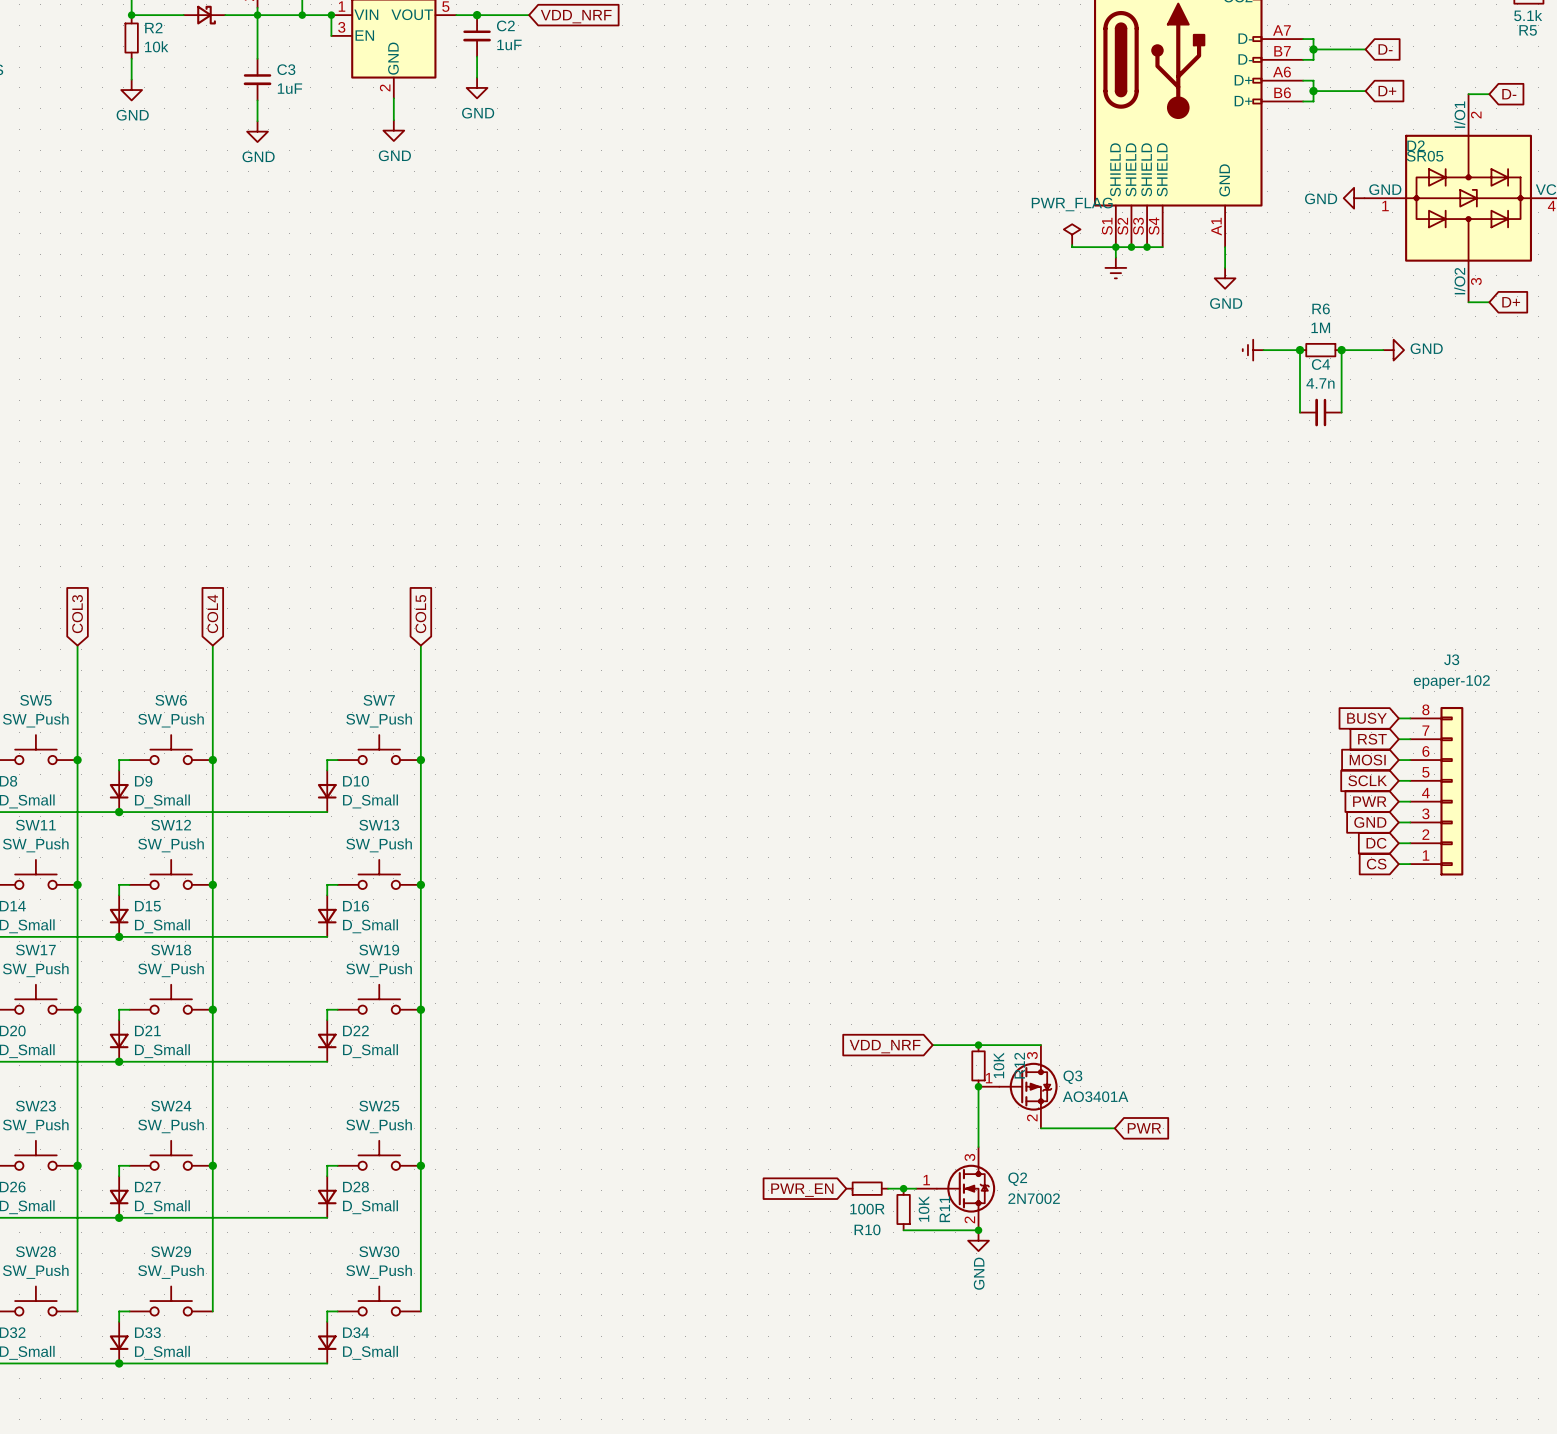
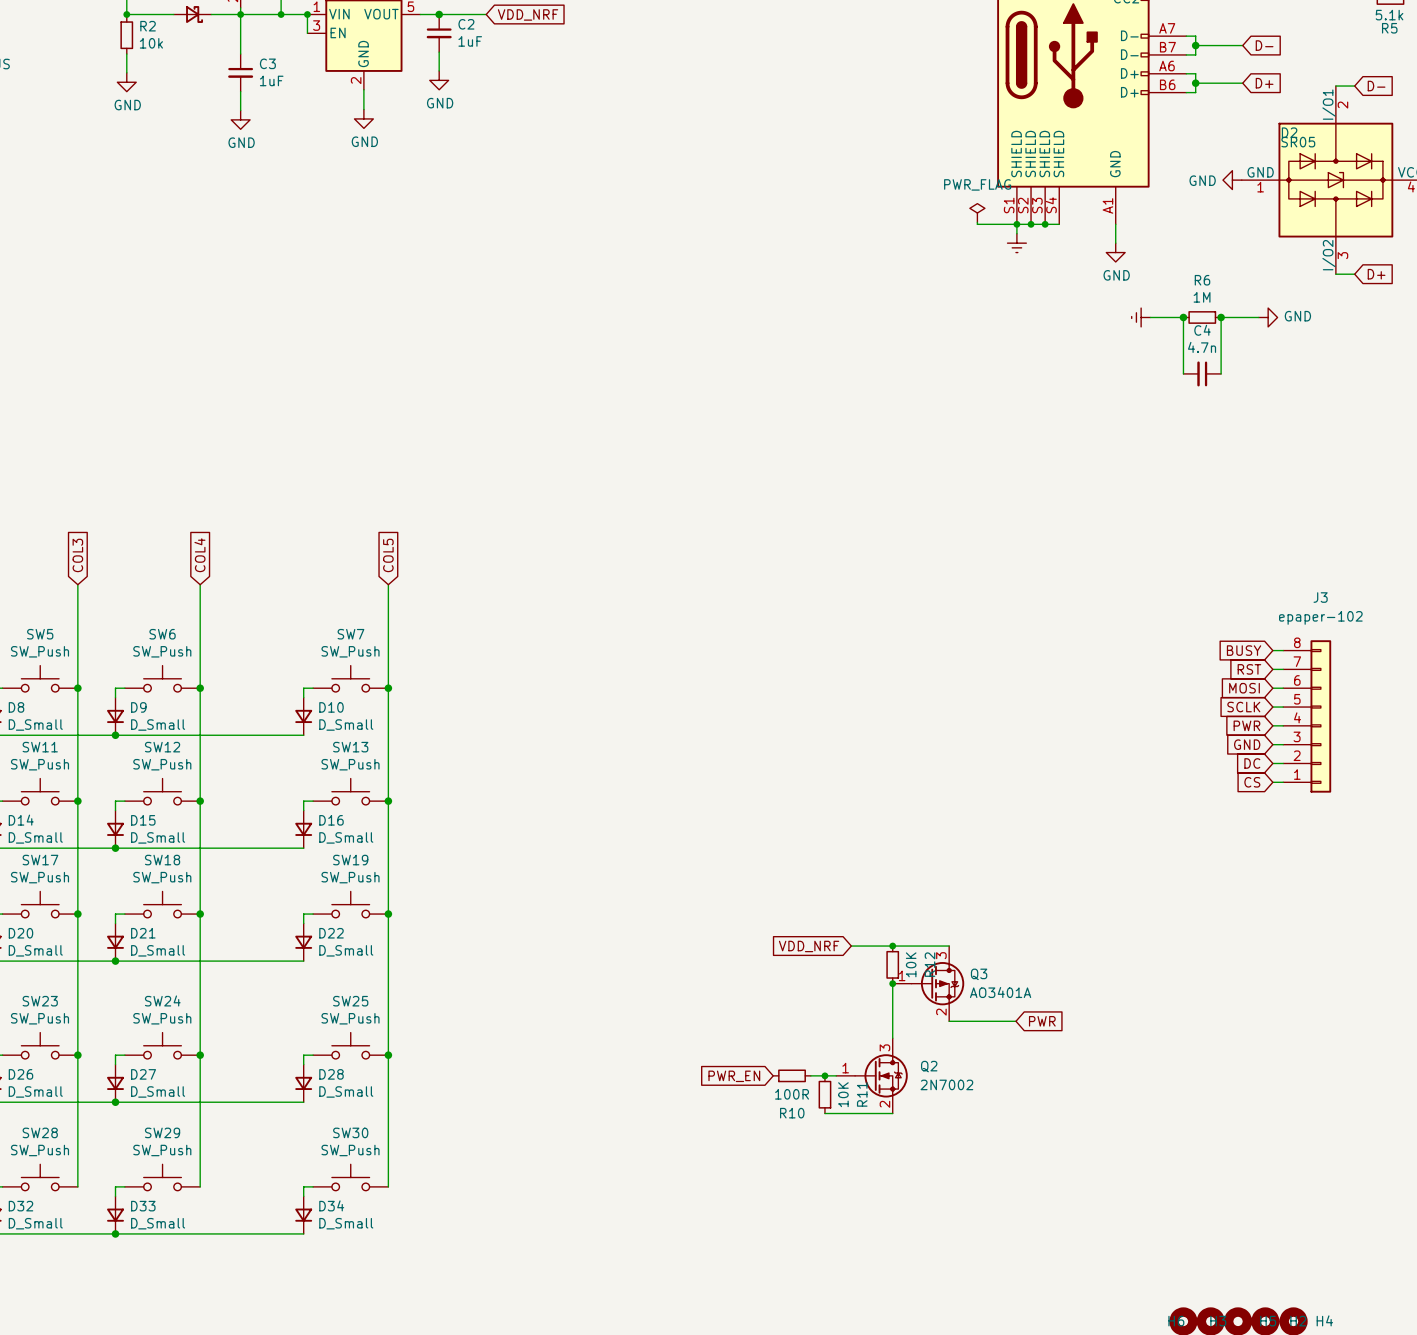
junction: (978, 1230) -> none
power symbol: GND (978, 1240) -> none

